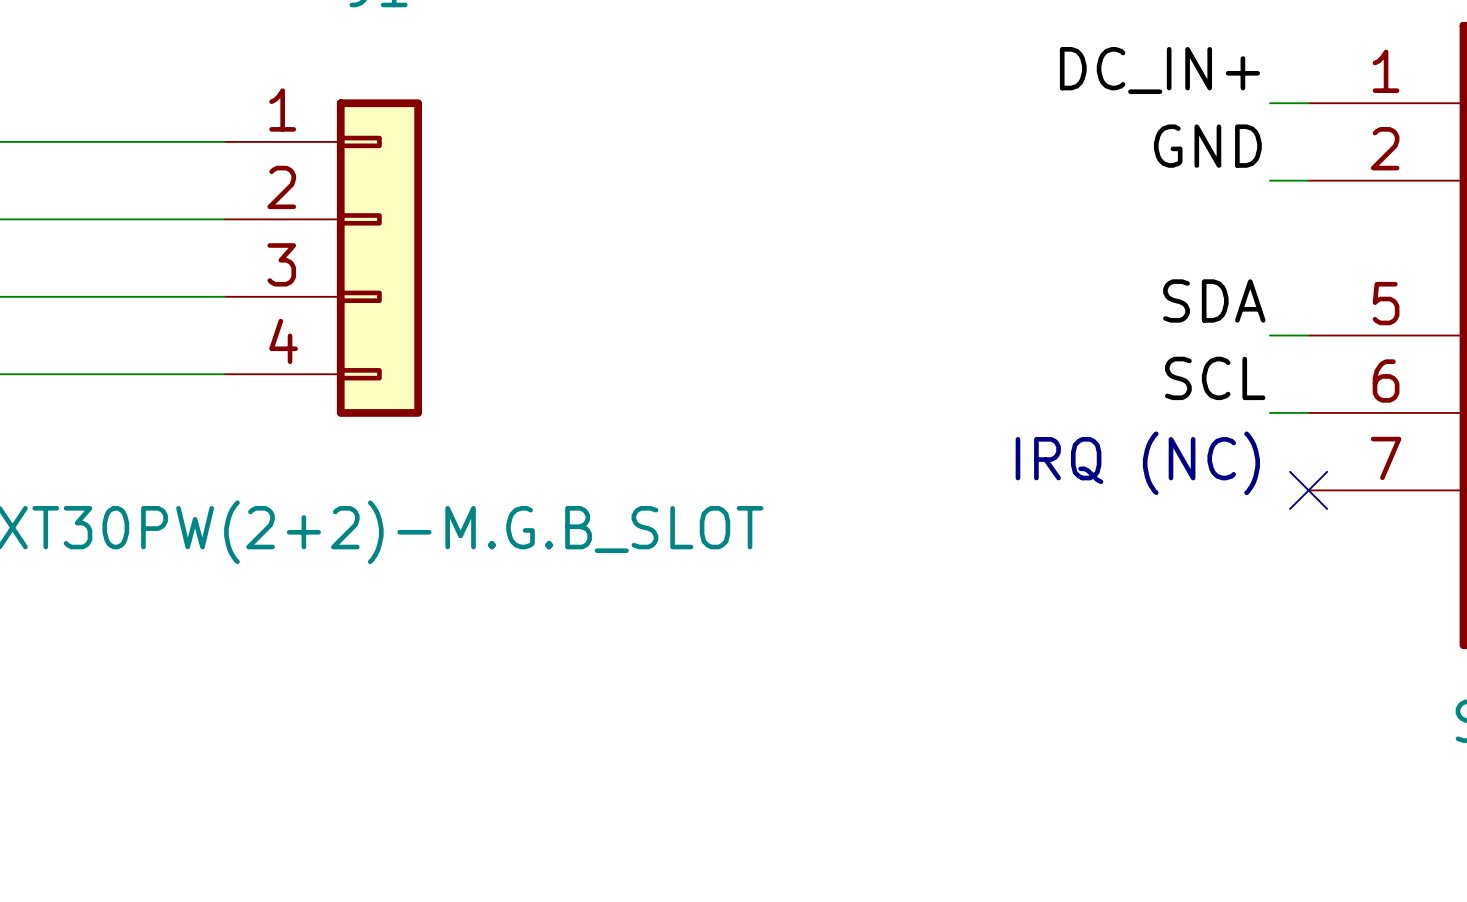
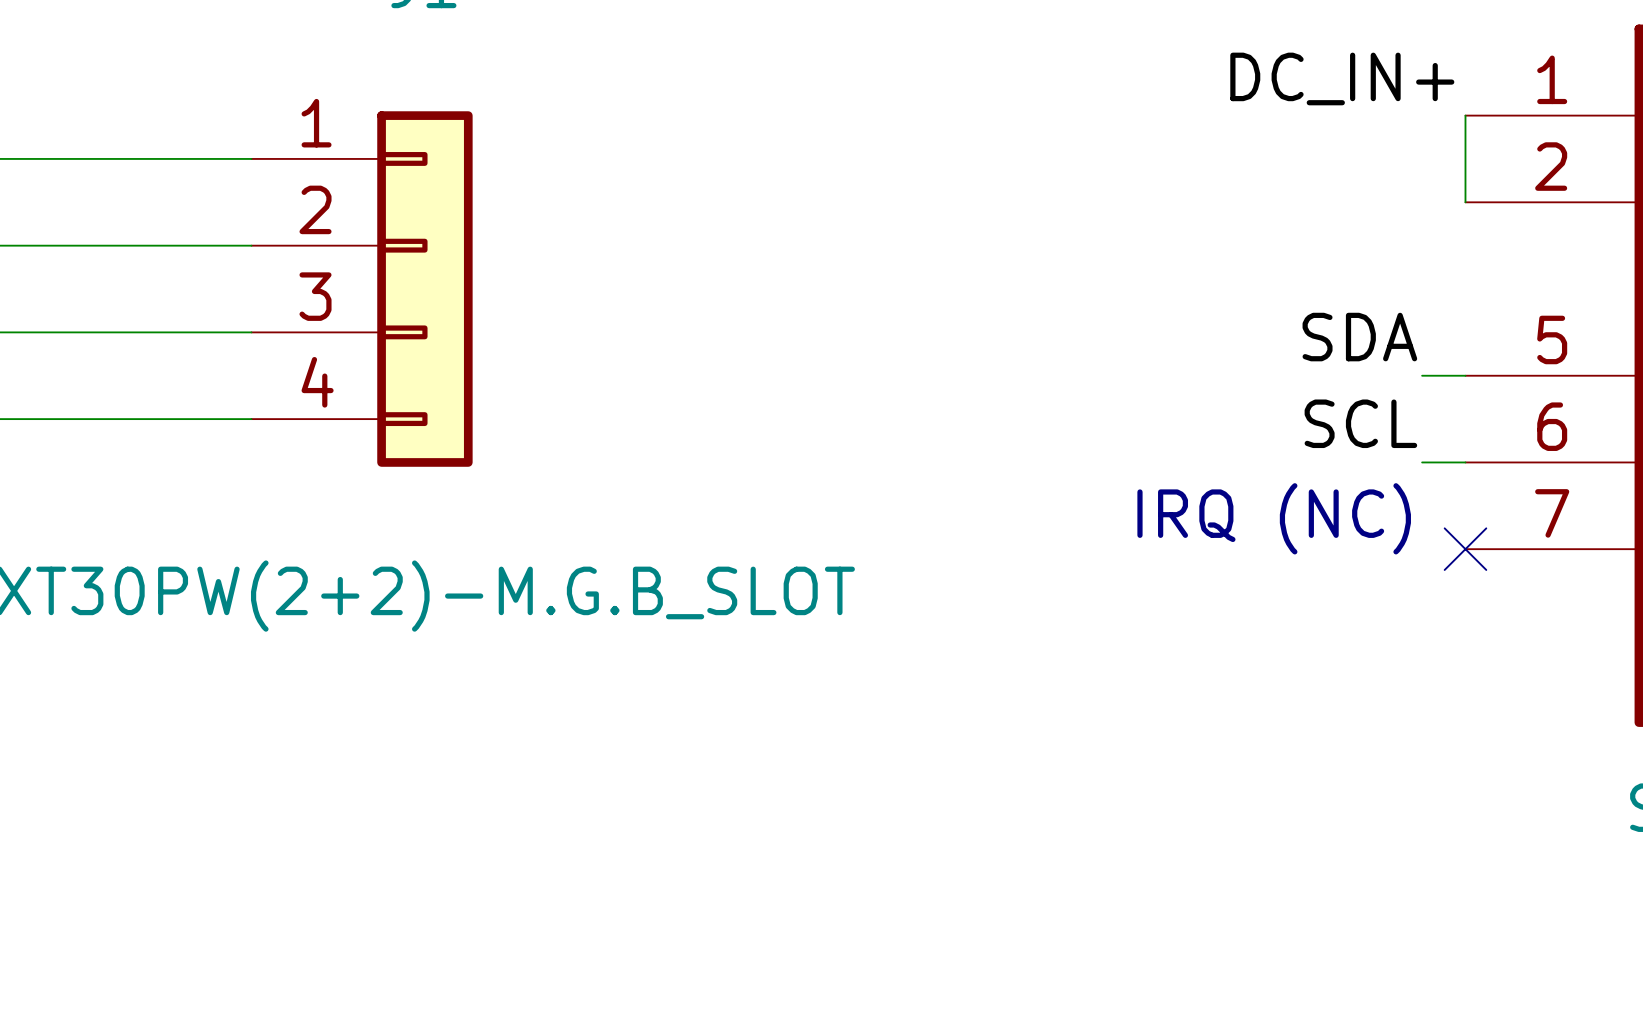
label position: DC_IN+ (1159, 70) -> DC_IN+ (1342, 78)
wire: (1269, 103) (1308, 103) -> (1465, 202) (1465, 115)
label: GND (1207, 146) -> none
wire: (1269, 180) (1308, 180) -> none

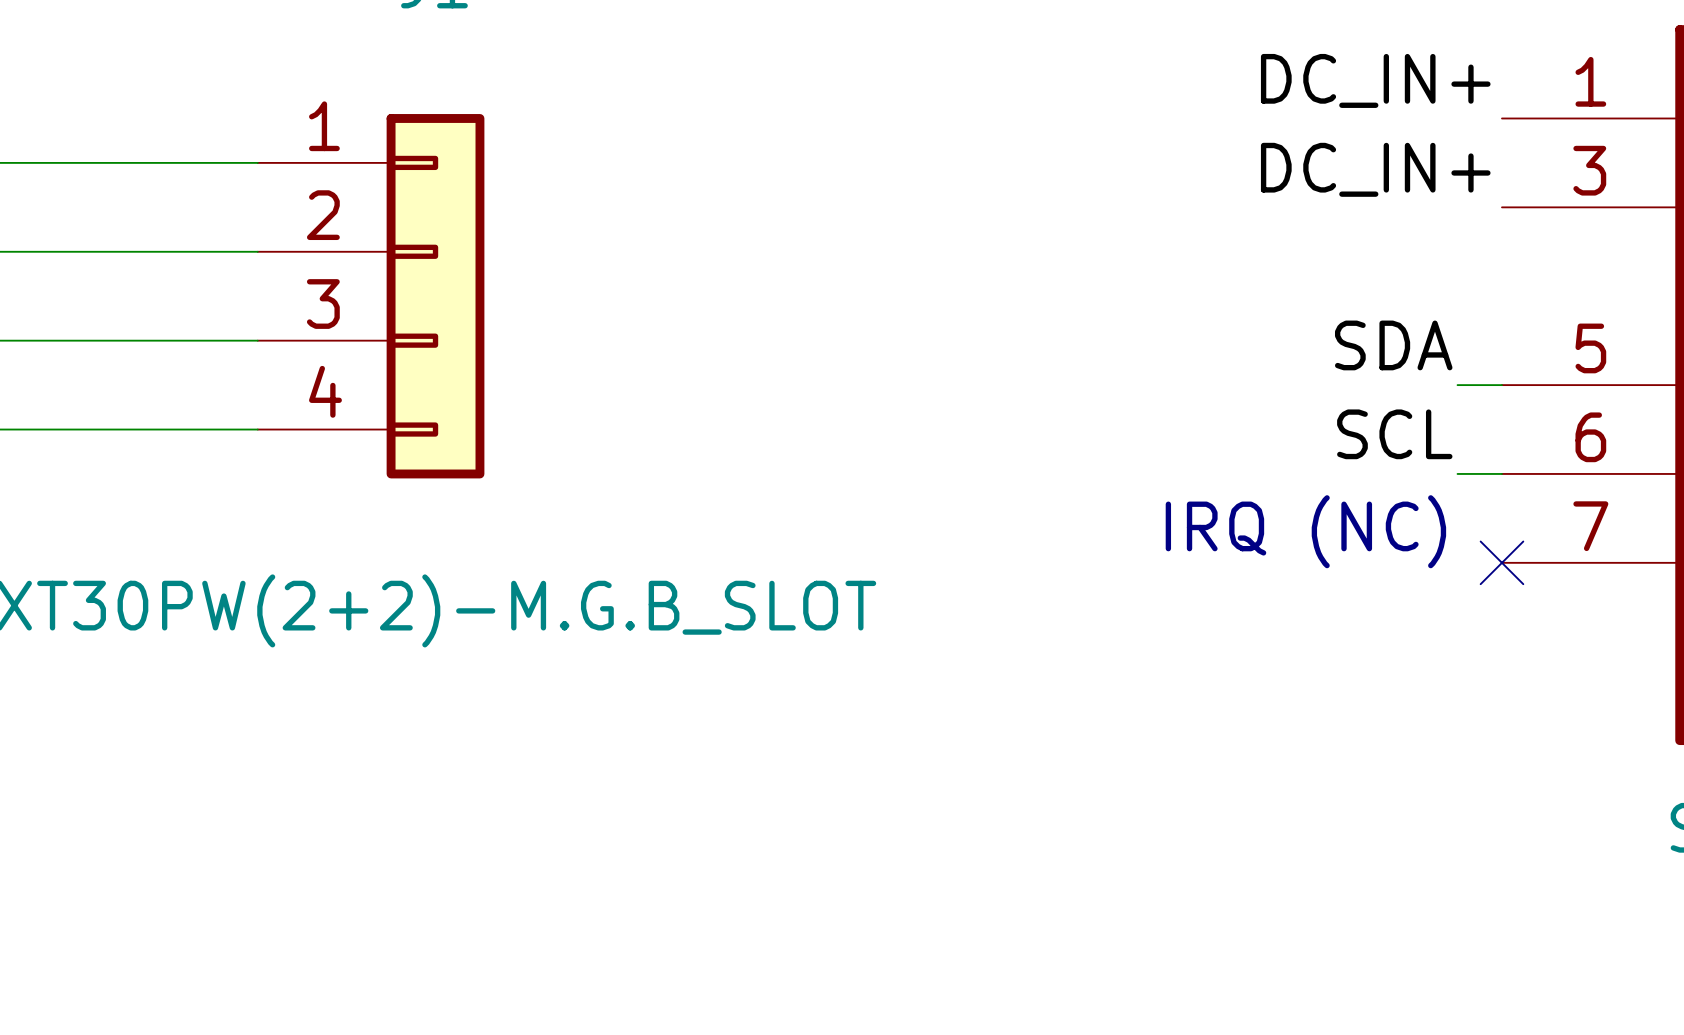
wire: (1465, 115) (1465, 202) -> none
label: none -> DC_IN+ (1375, 169)
part pin number: 2 (1551, 166) -> 3 (1589, 170)

